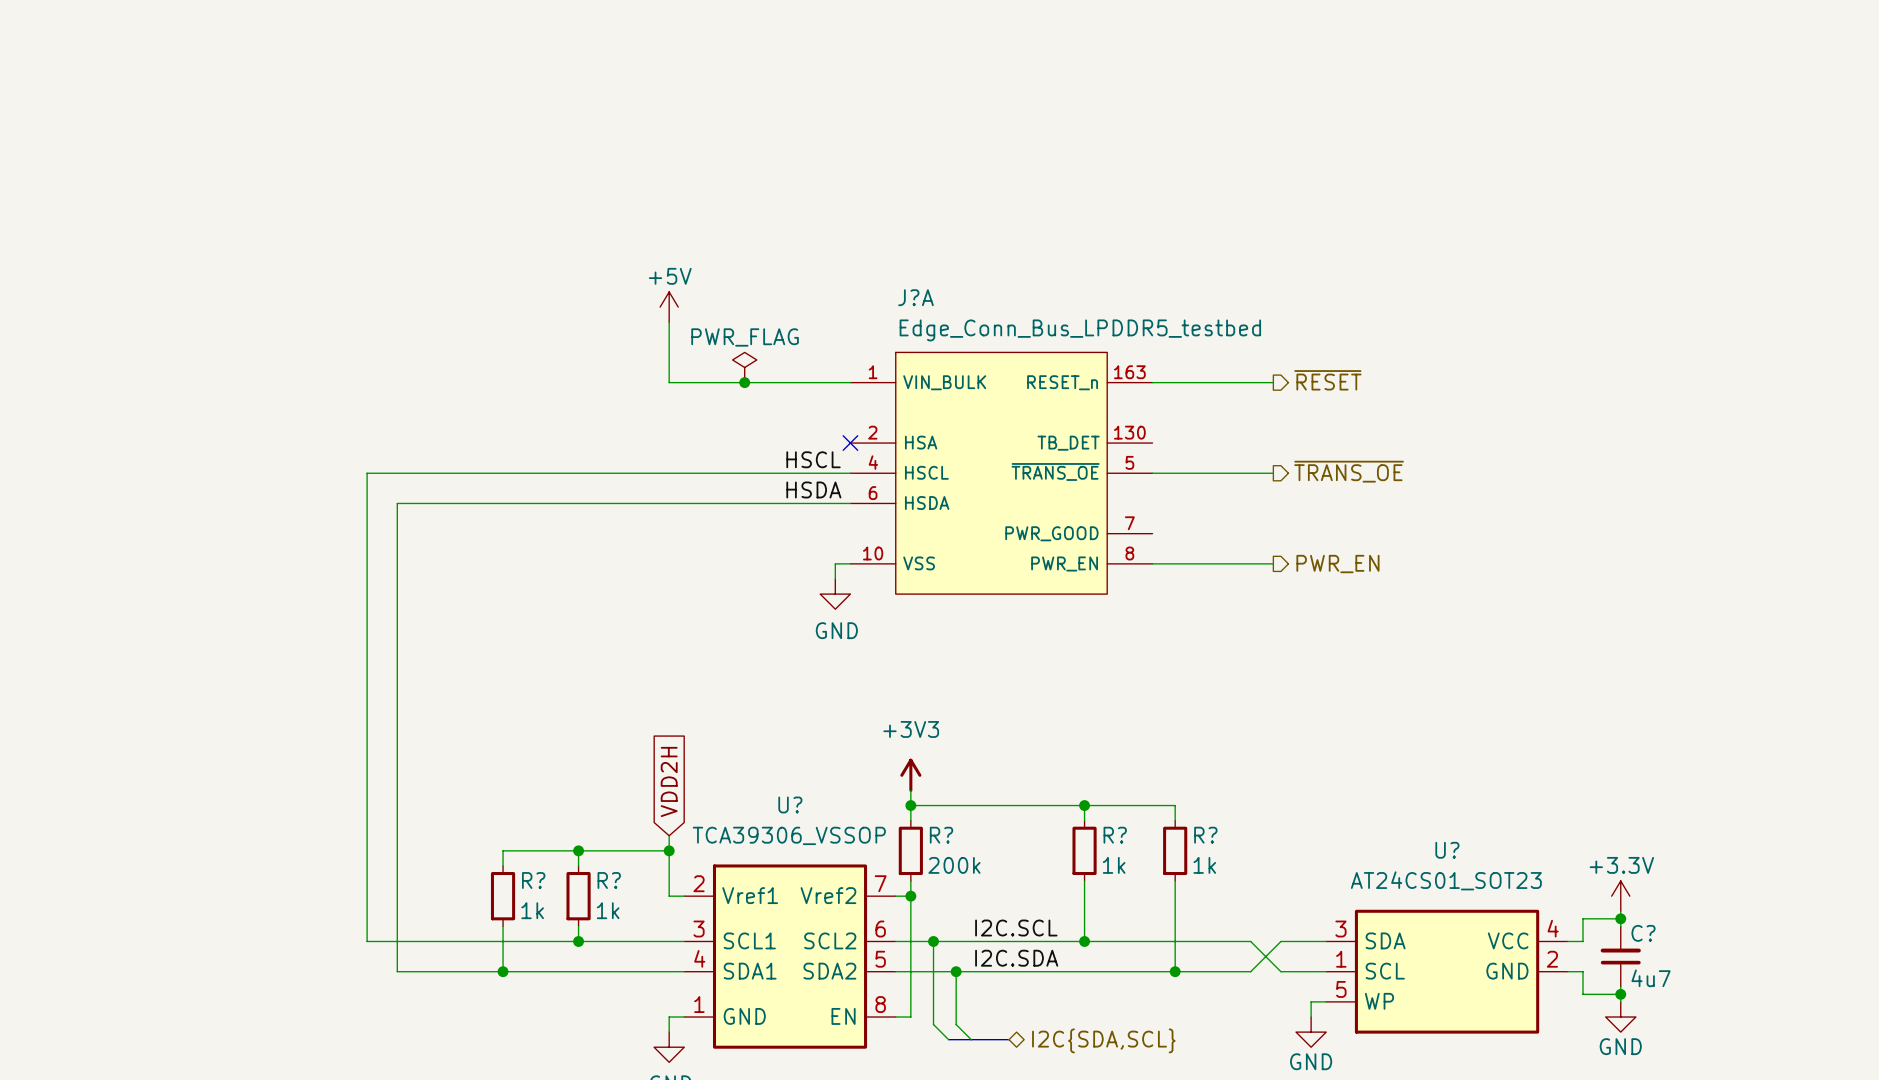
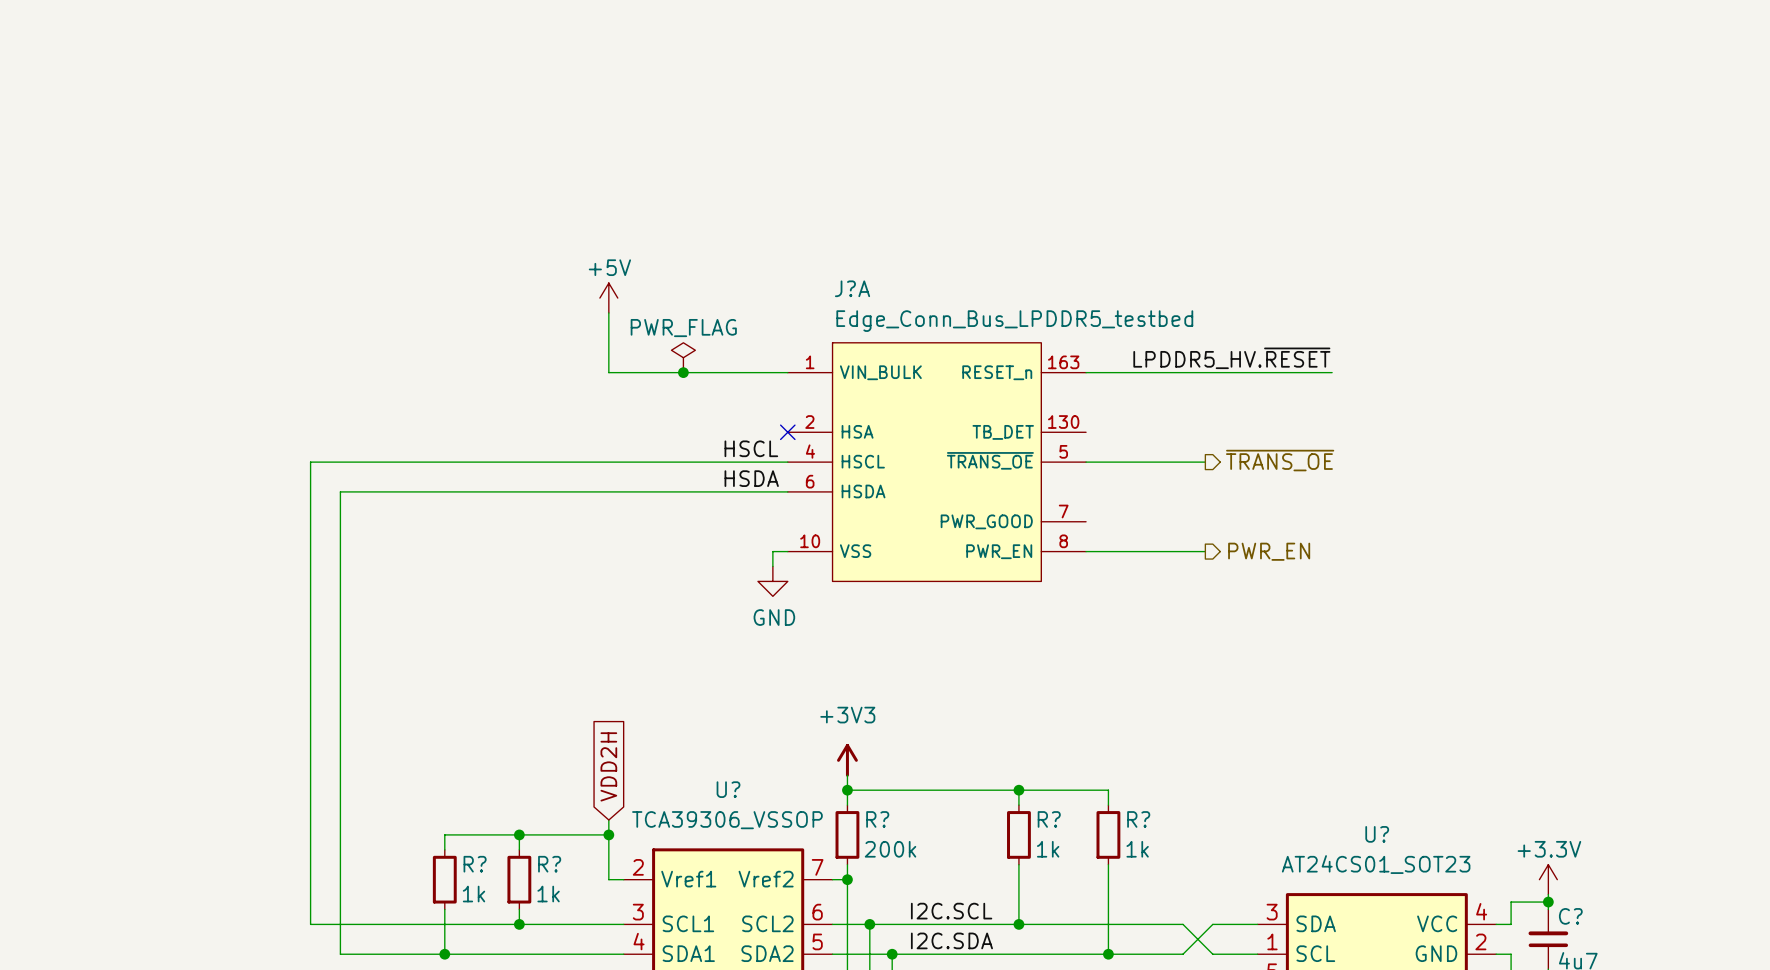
label: none -> LPDDR5_HV.~{RESET} (1231, 358)
hierarchical label: ~{RESET} (1327, 380) -> none
wire: none -> (1205, 372) (1332, 372)

